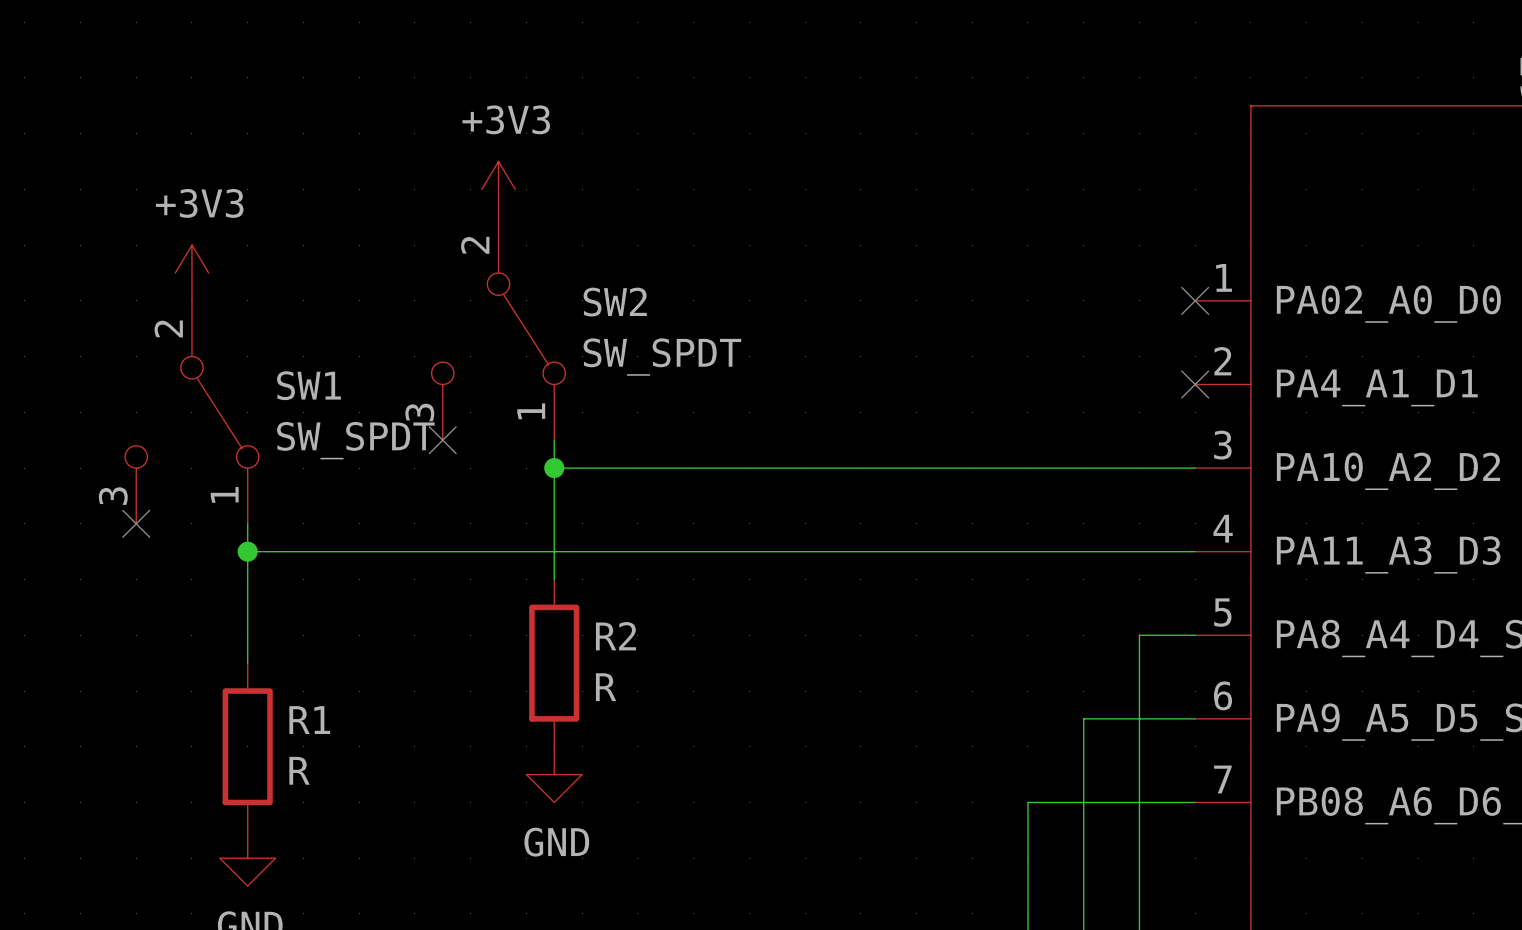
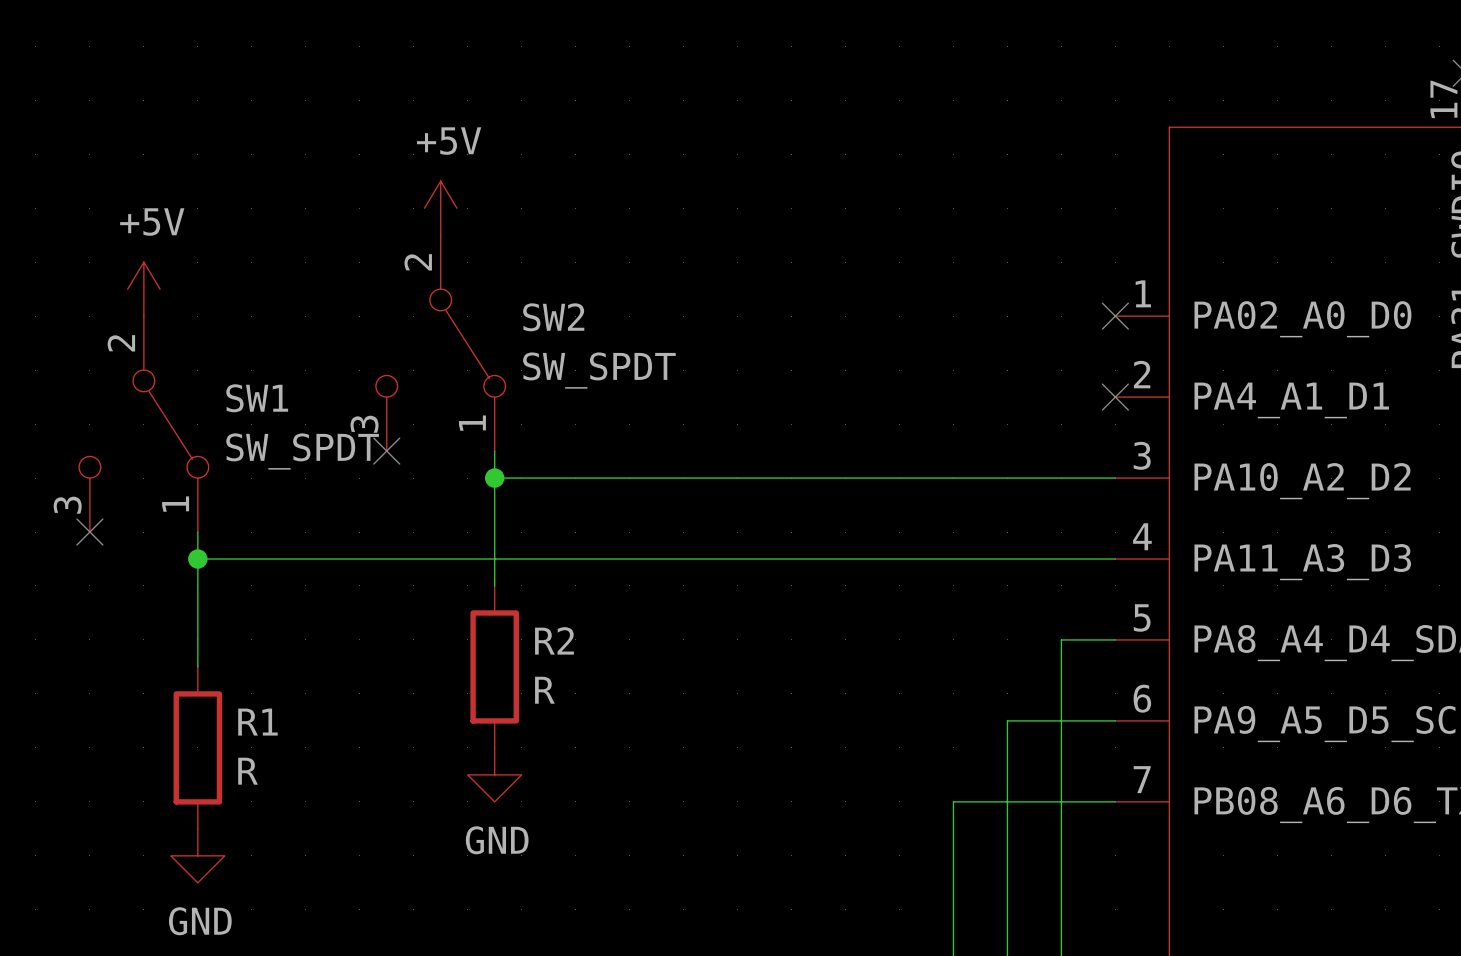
power symbol: +3V3 (498, 189) -> +5V (440, 208)
power symbol: +3V3 (191, 273) -> +5V (143, 289)

